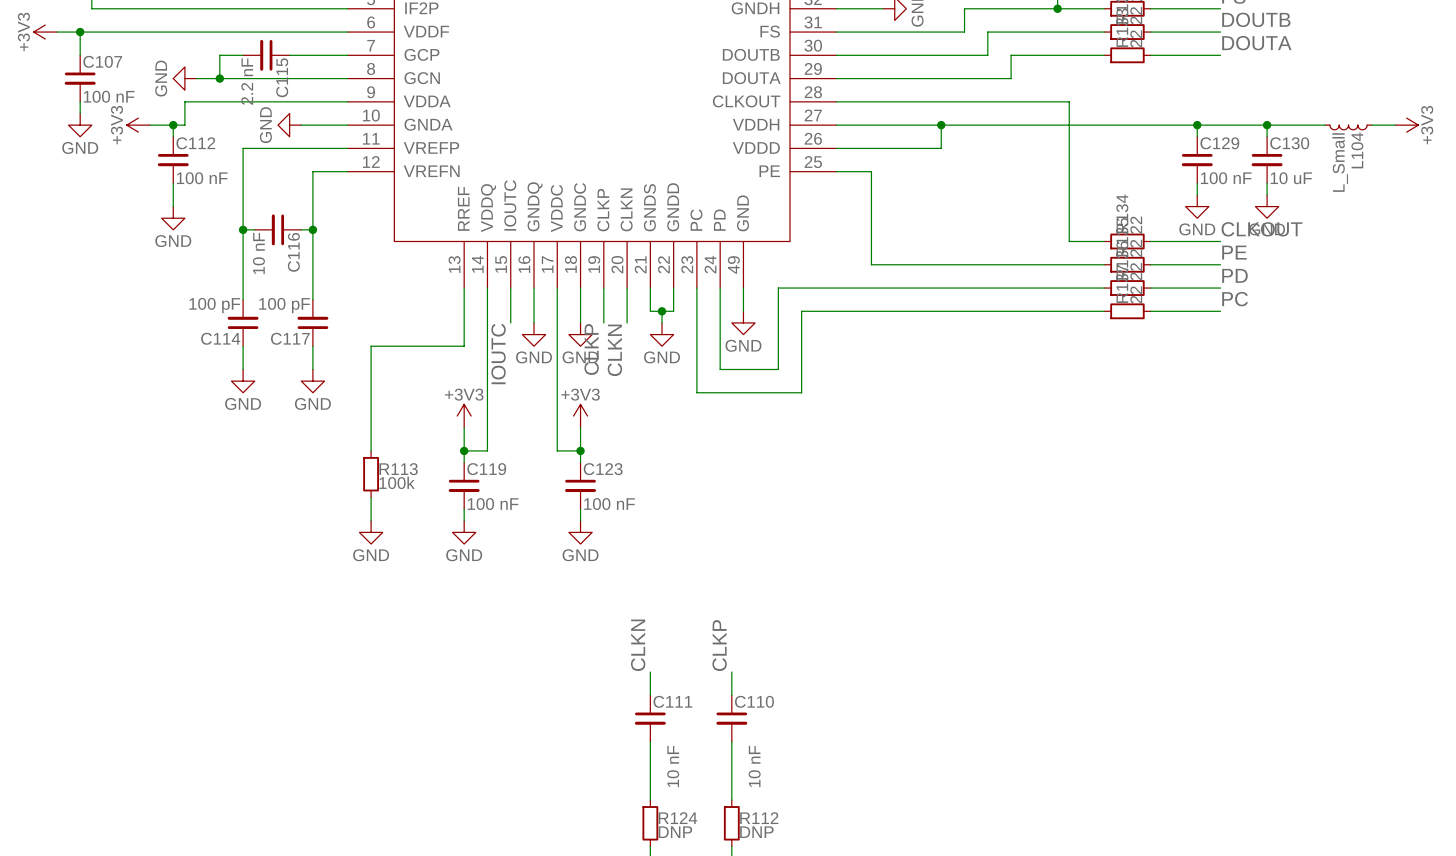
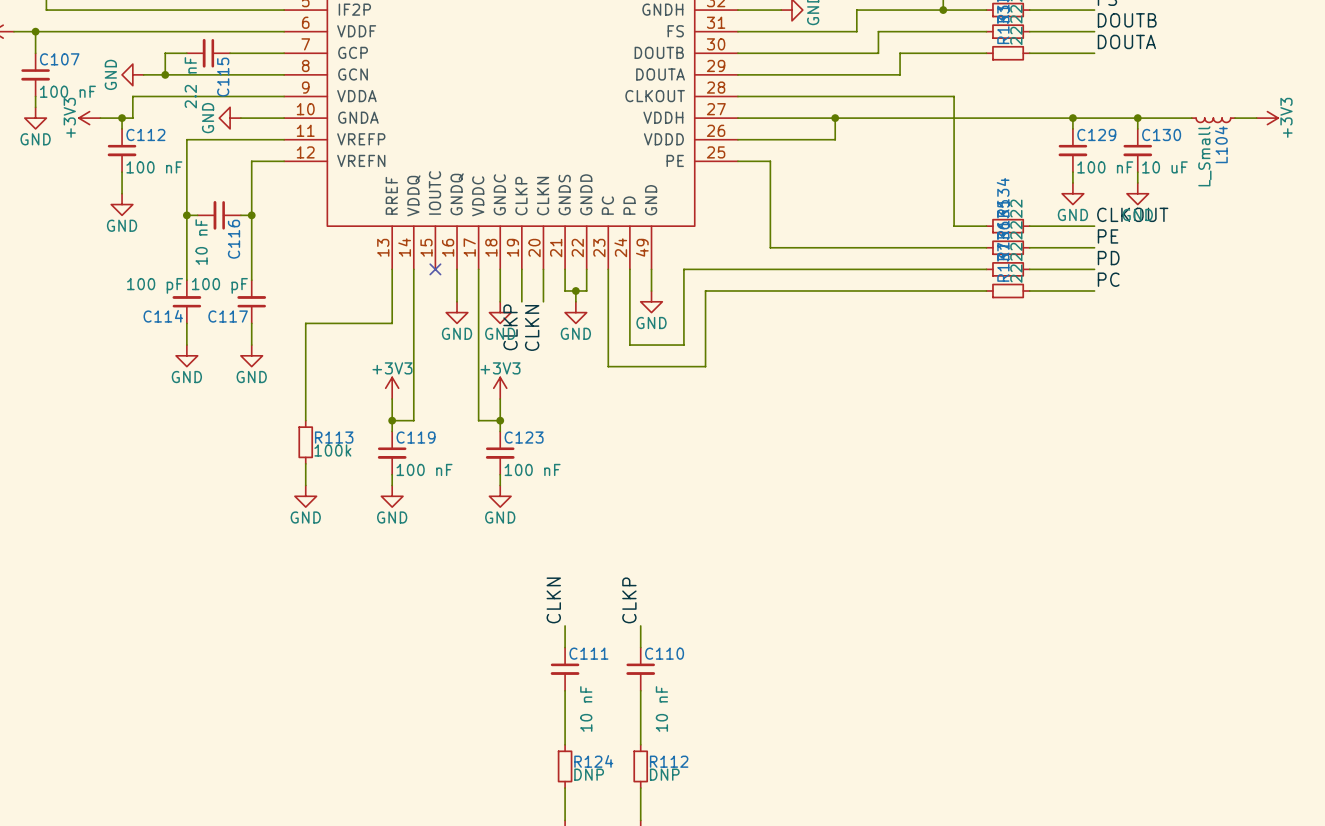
wire: (510, 288) (510, 322) -> none
no-connect mark: none -> (435, 269)
label: IOUTC (498, 353) -> none

